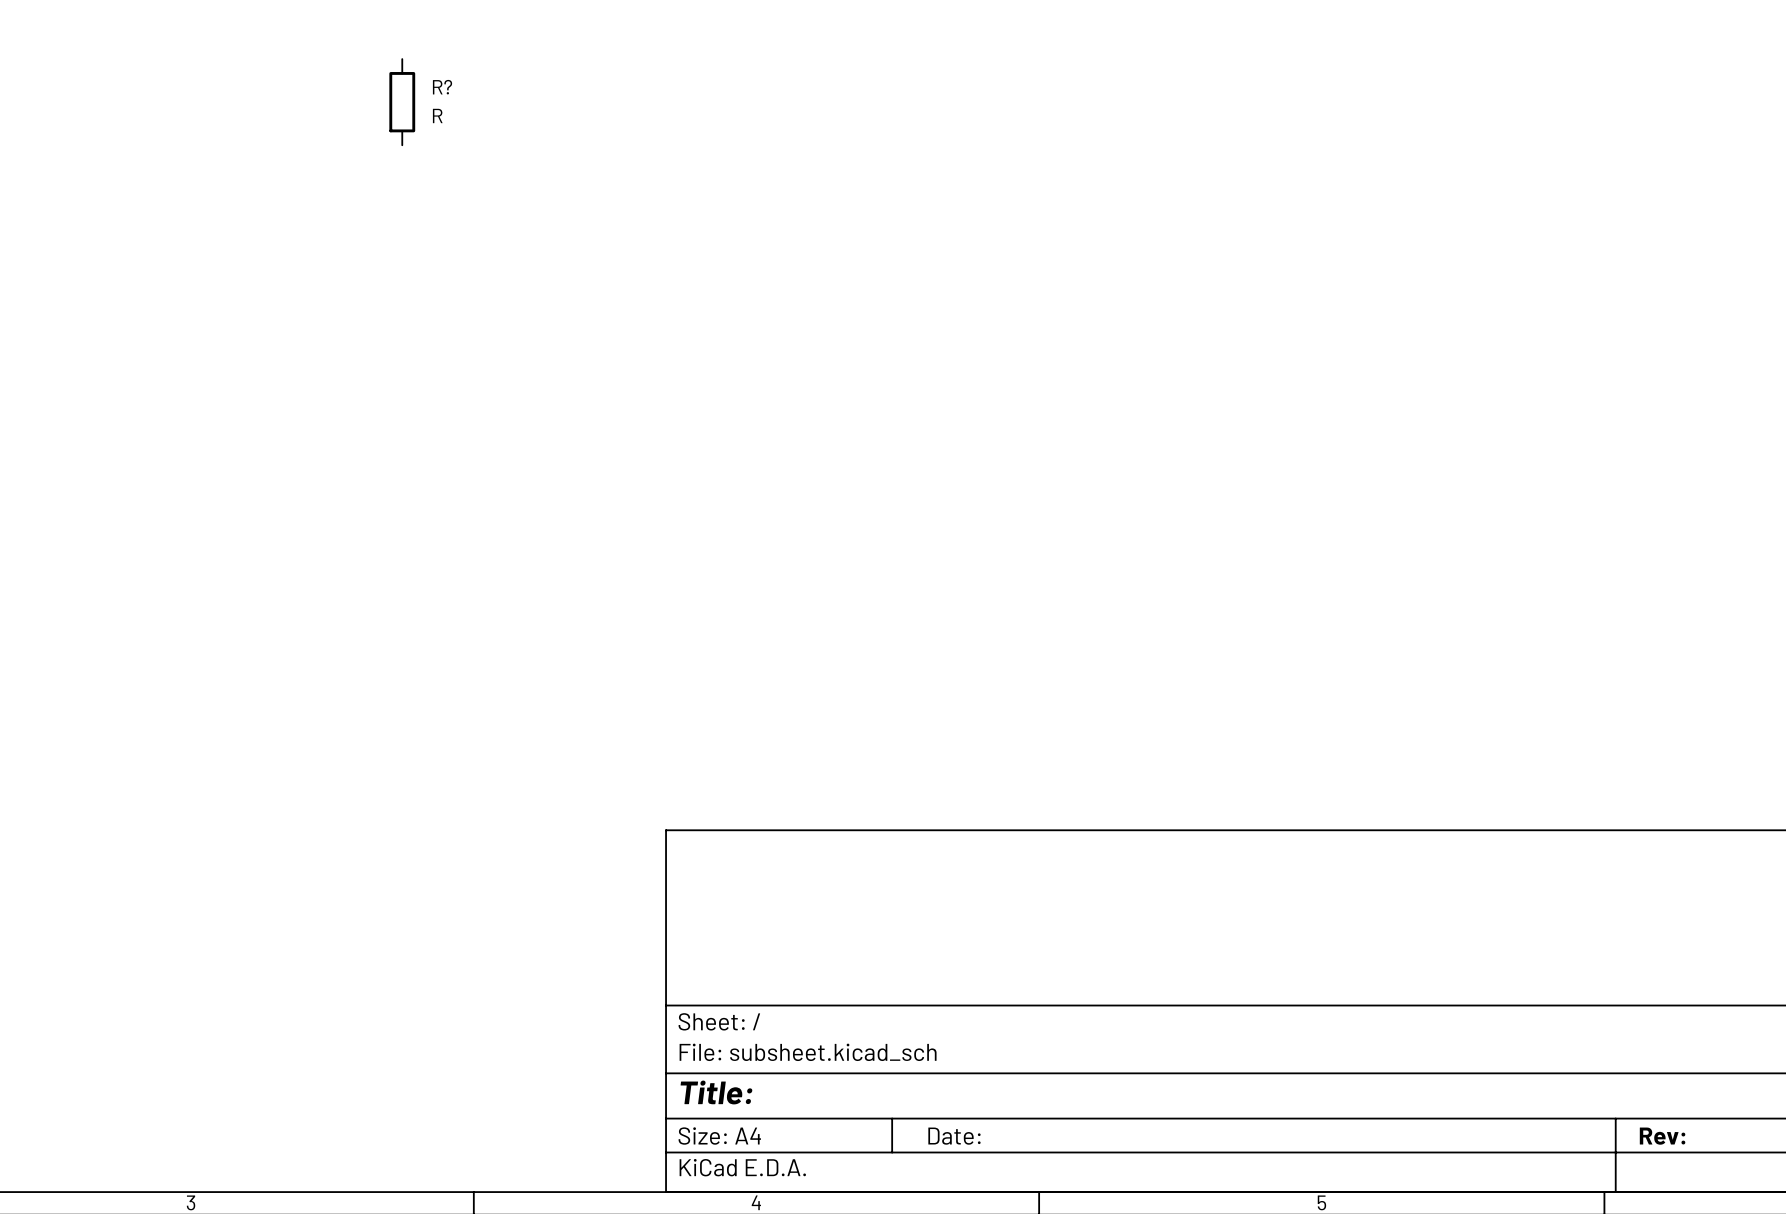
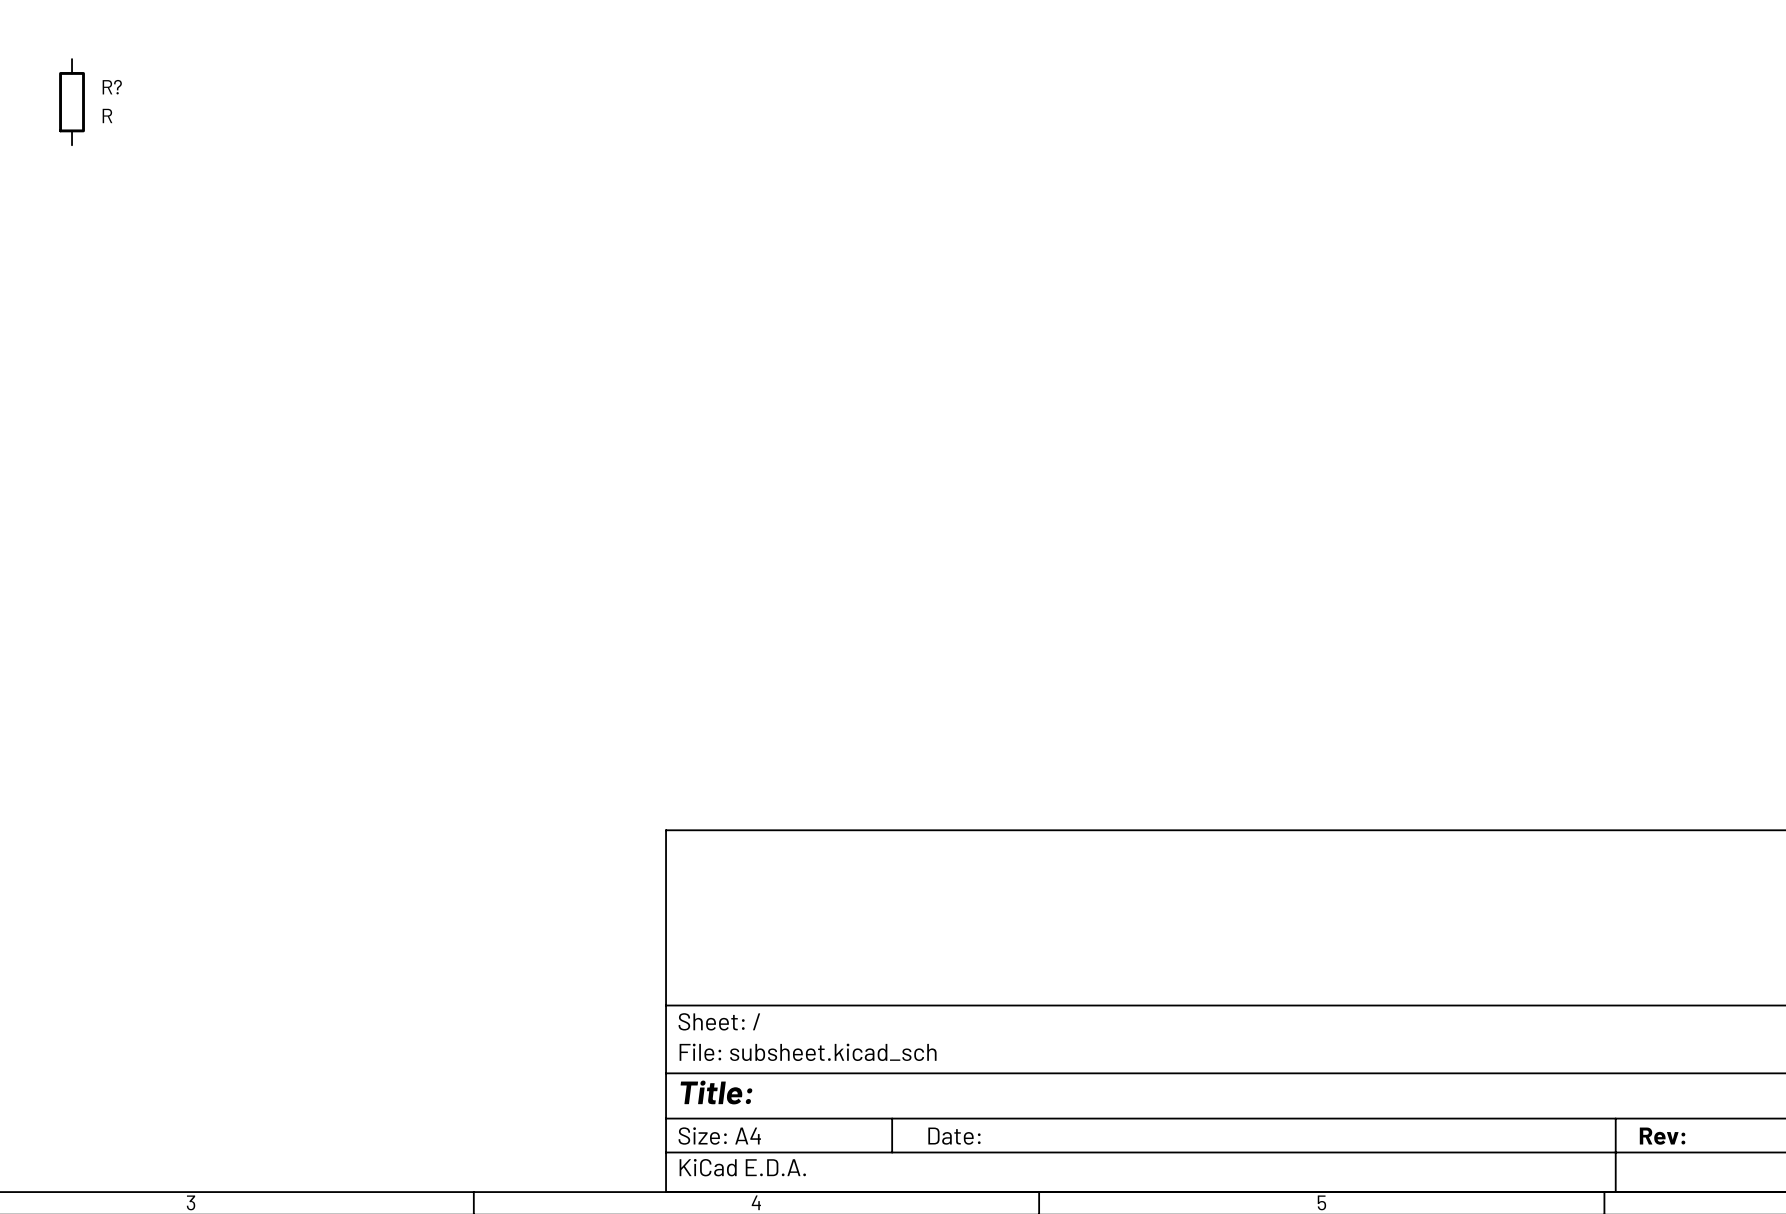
R?: none -> R (72, 102)
R?: R (402, 102) -> none

